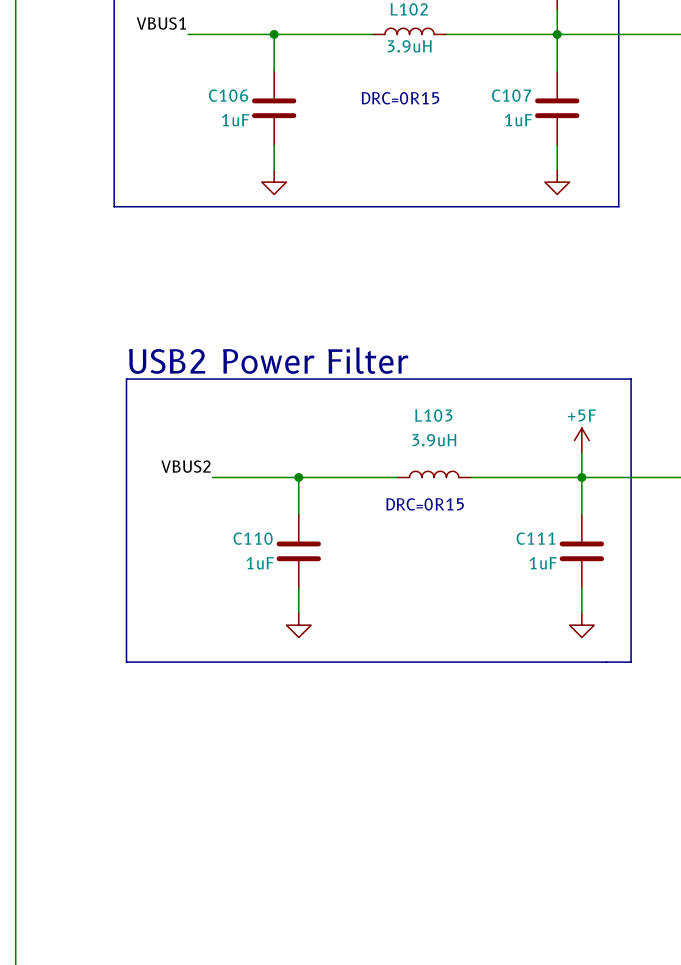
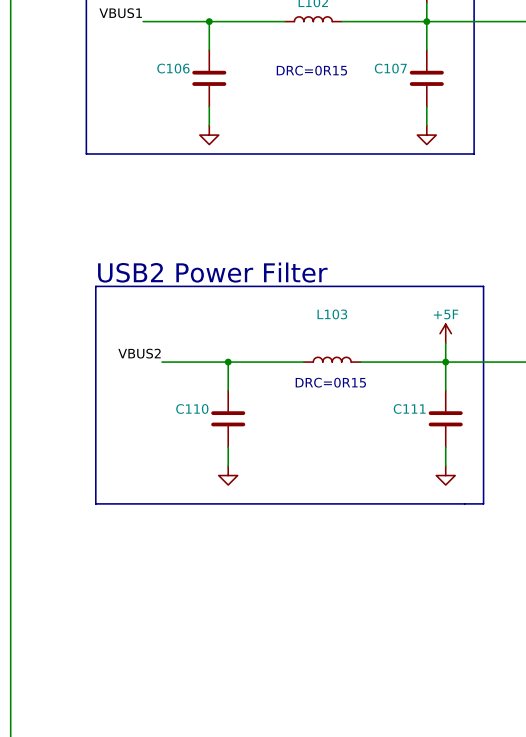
L102 value: 3.9uH (409, 46) -> none
C106 value: 1uF (235, 120) -> none
C107 value: 1uF (518, 120) -> none
L103 value: 3.9uH (434, 440) -> none
C110 value: 1uF (260, 563) -> none
C111 value: 1uF (543, 563) -> none

